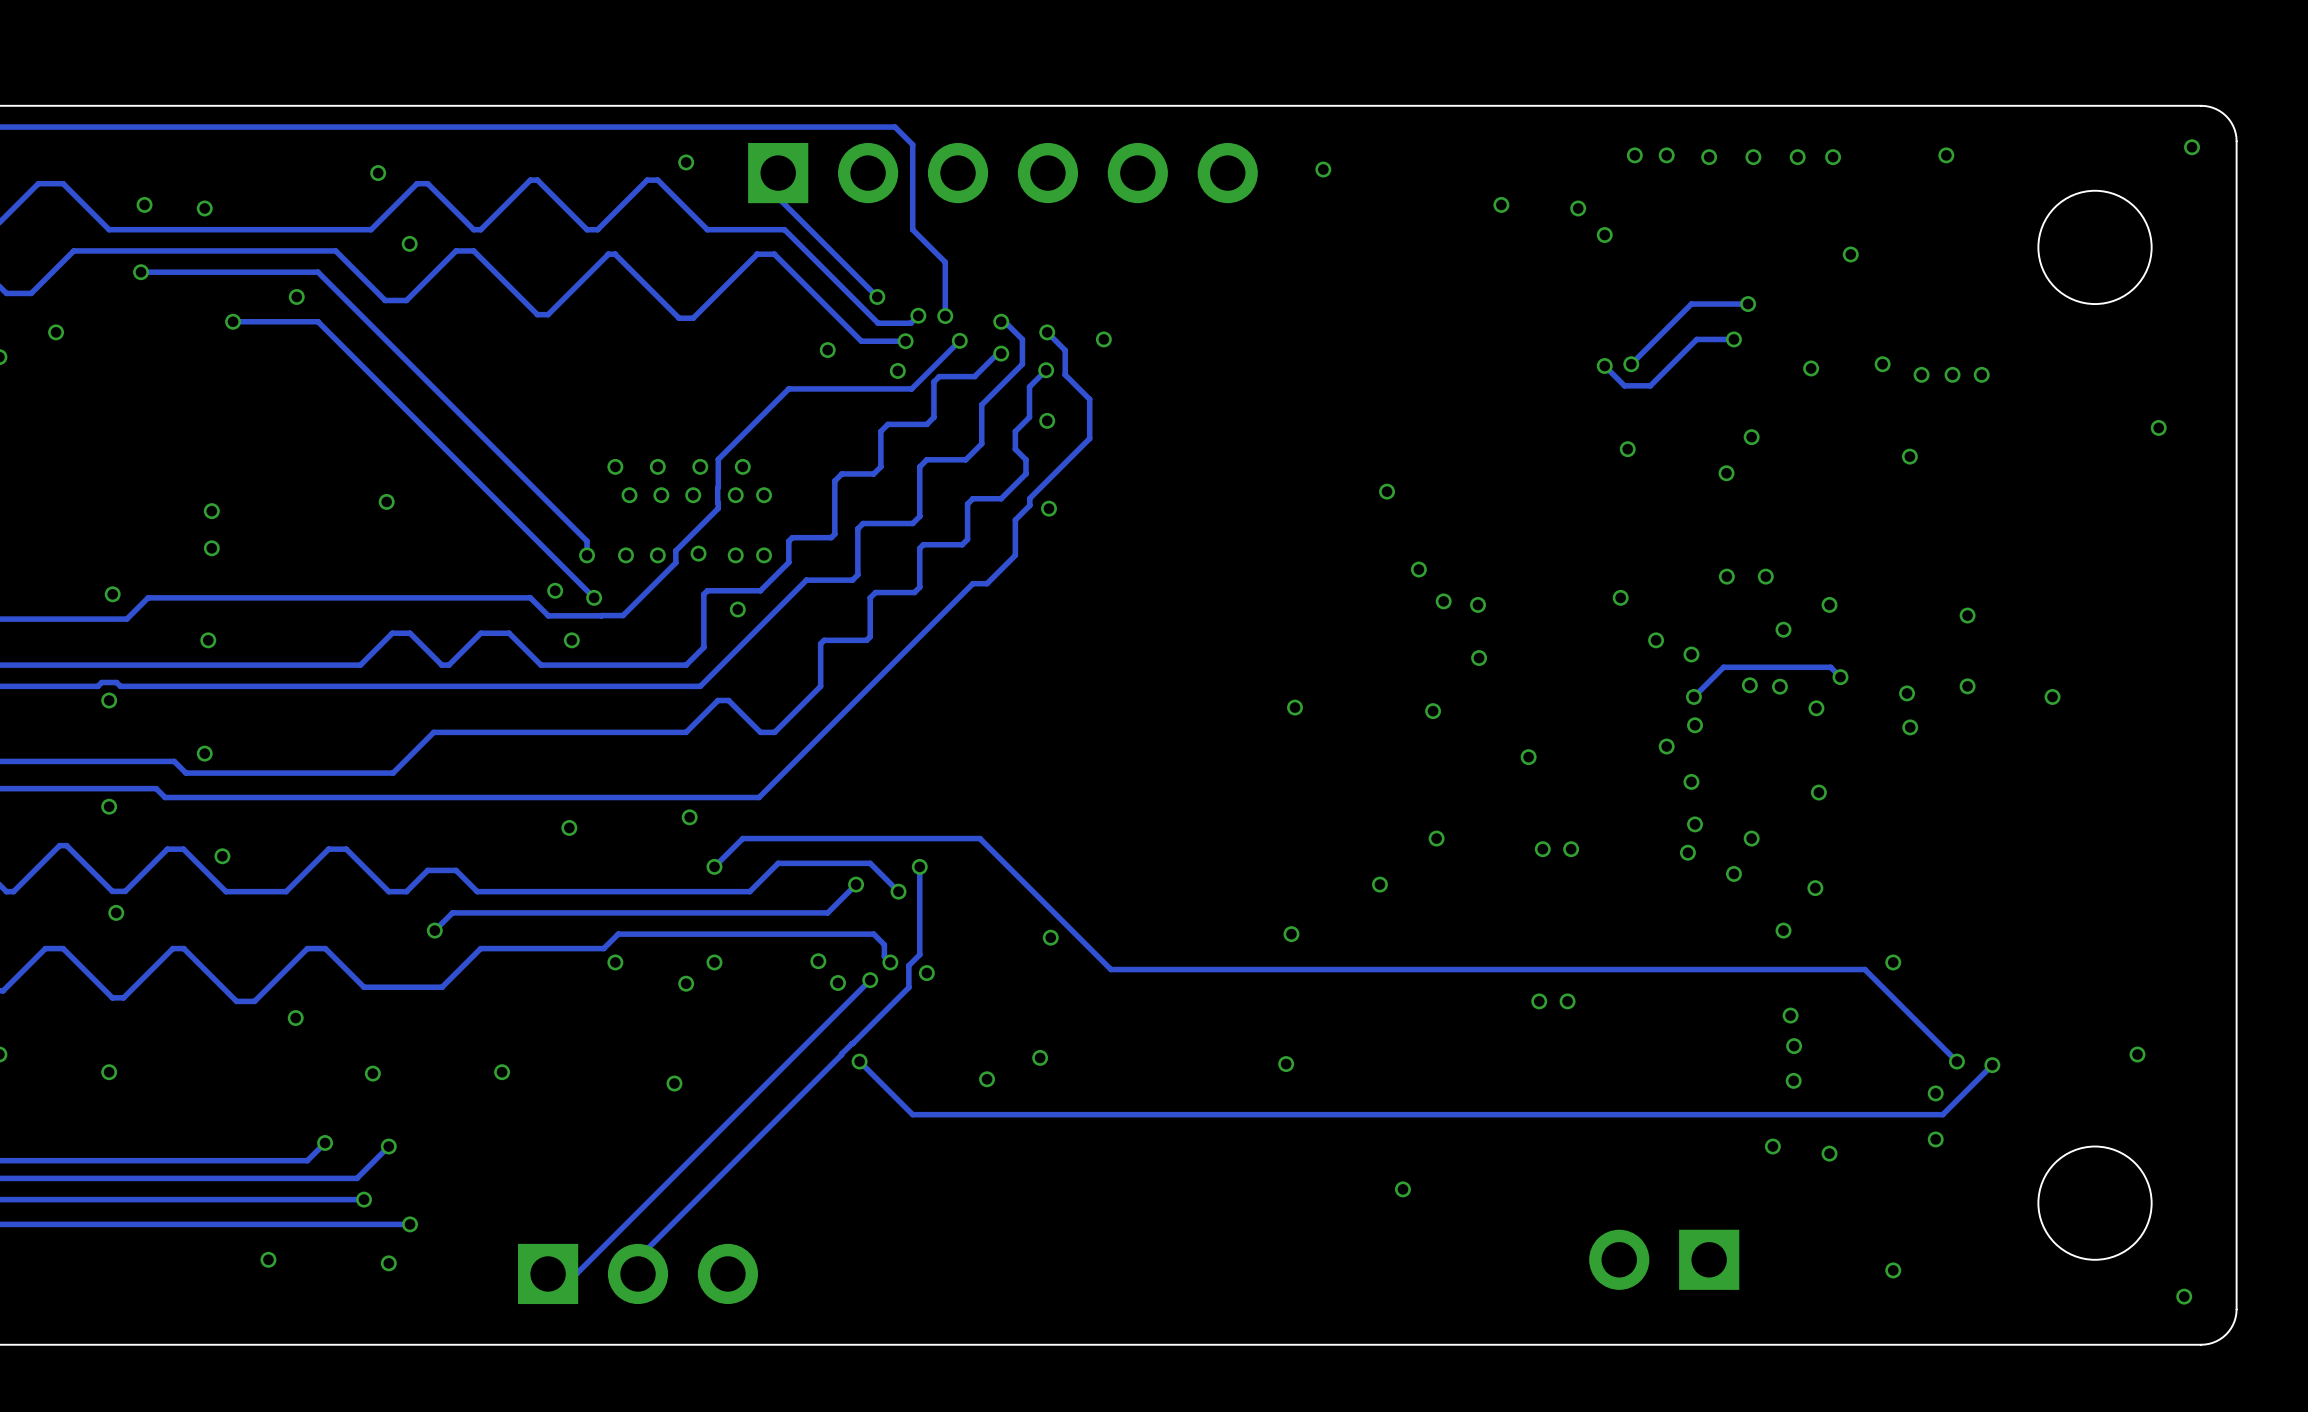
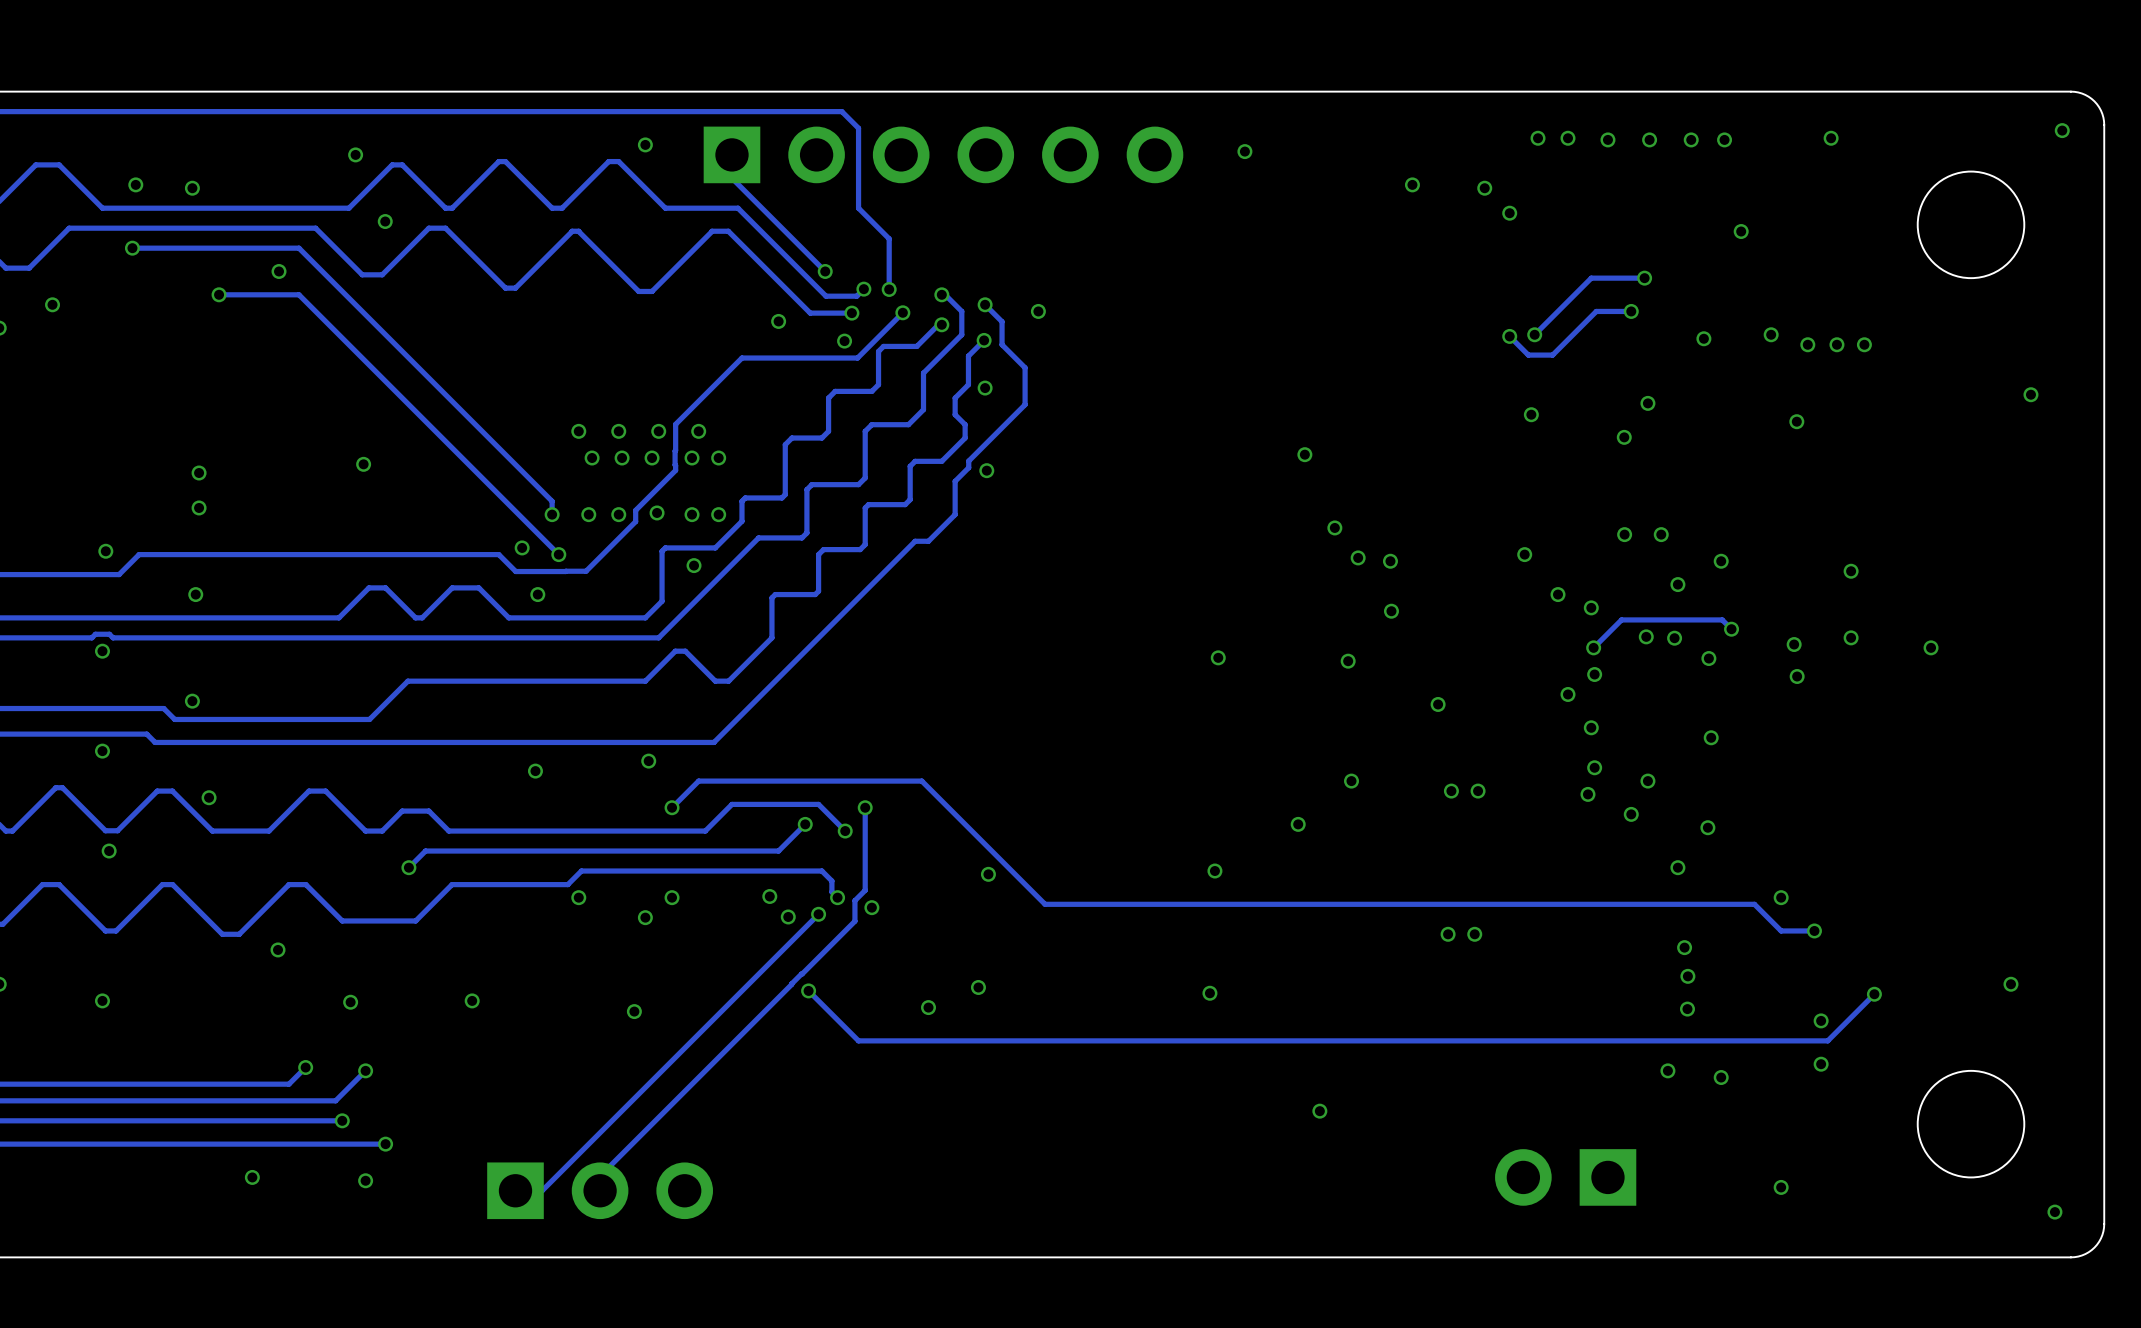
track: (1893, 997) (1956, 1061) -> (1781, 930) (1814, 930)
via position: (1956, 1061) -> (1814, 930)

